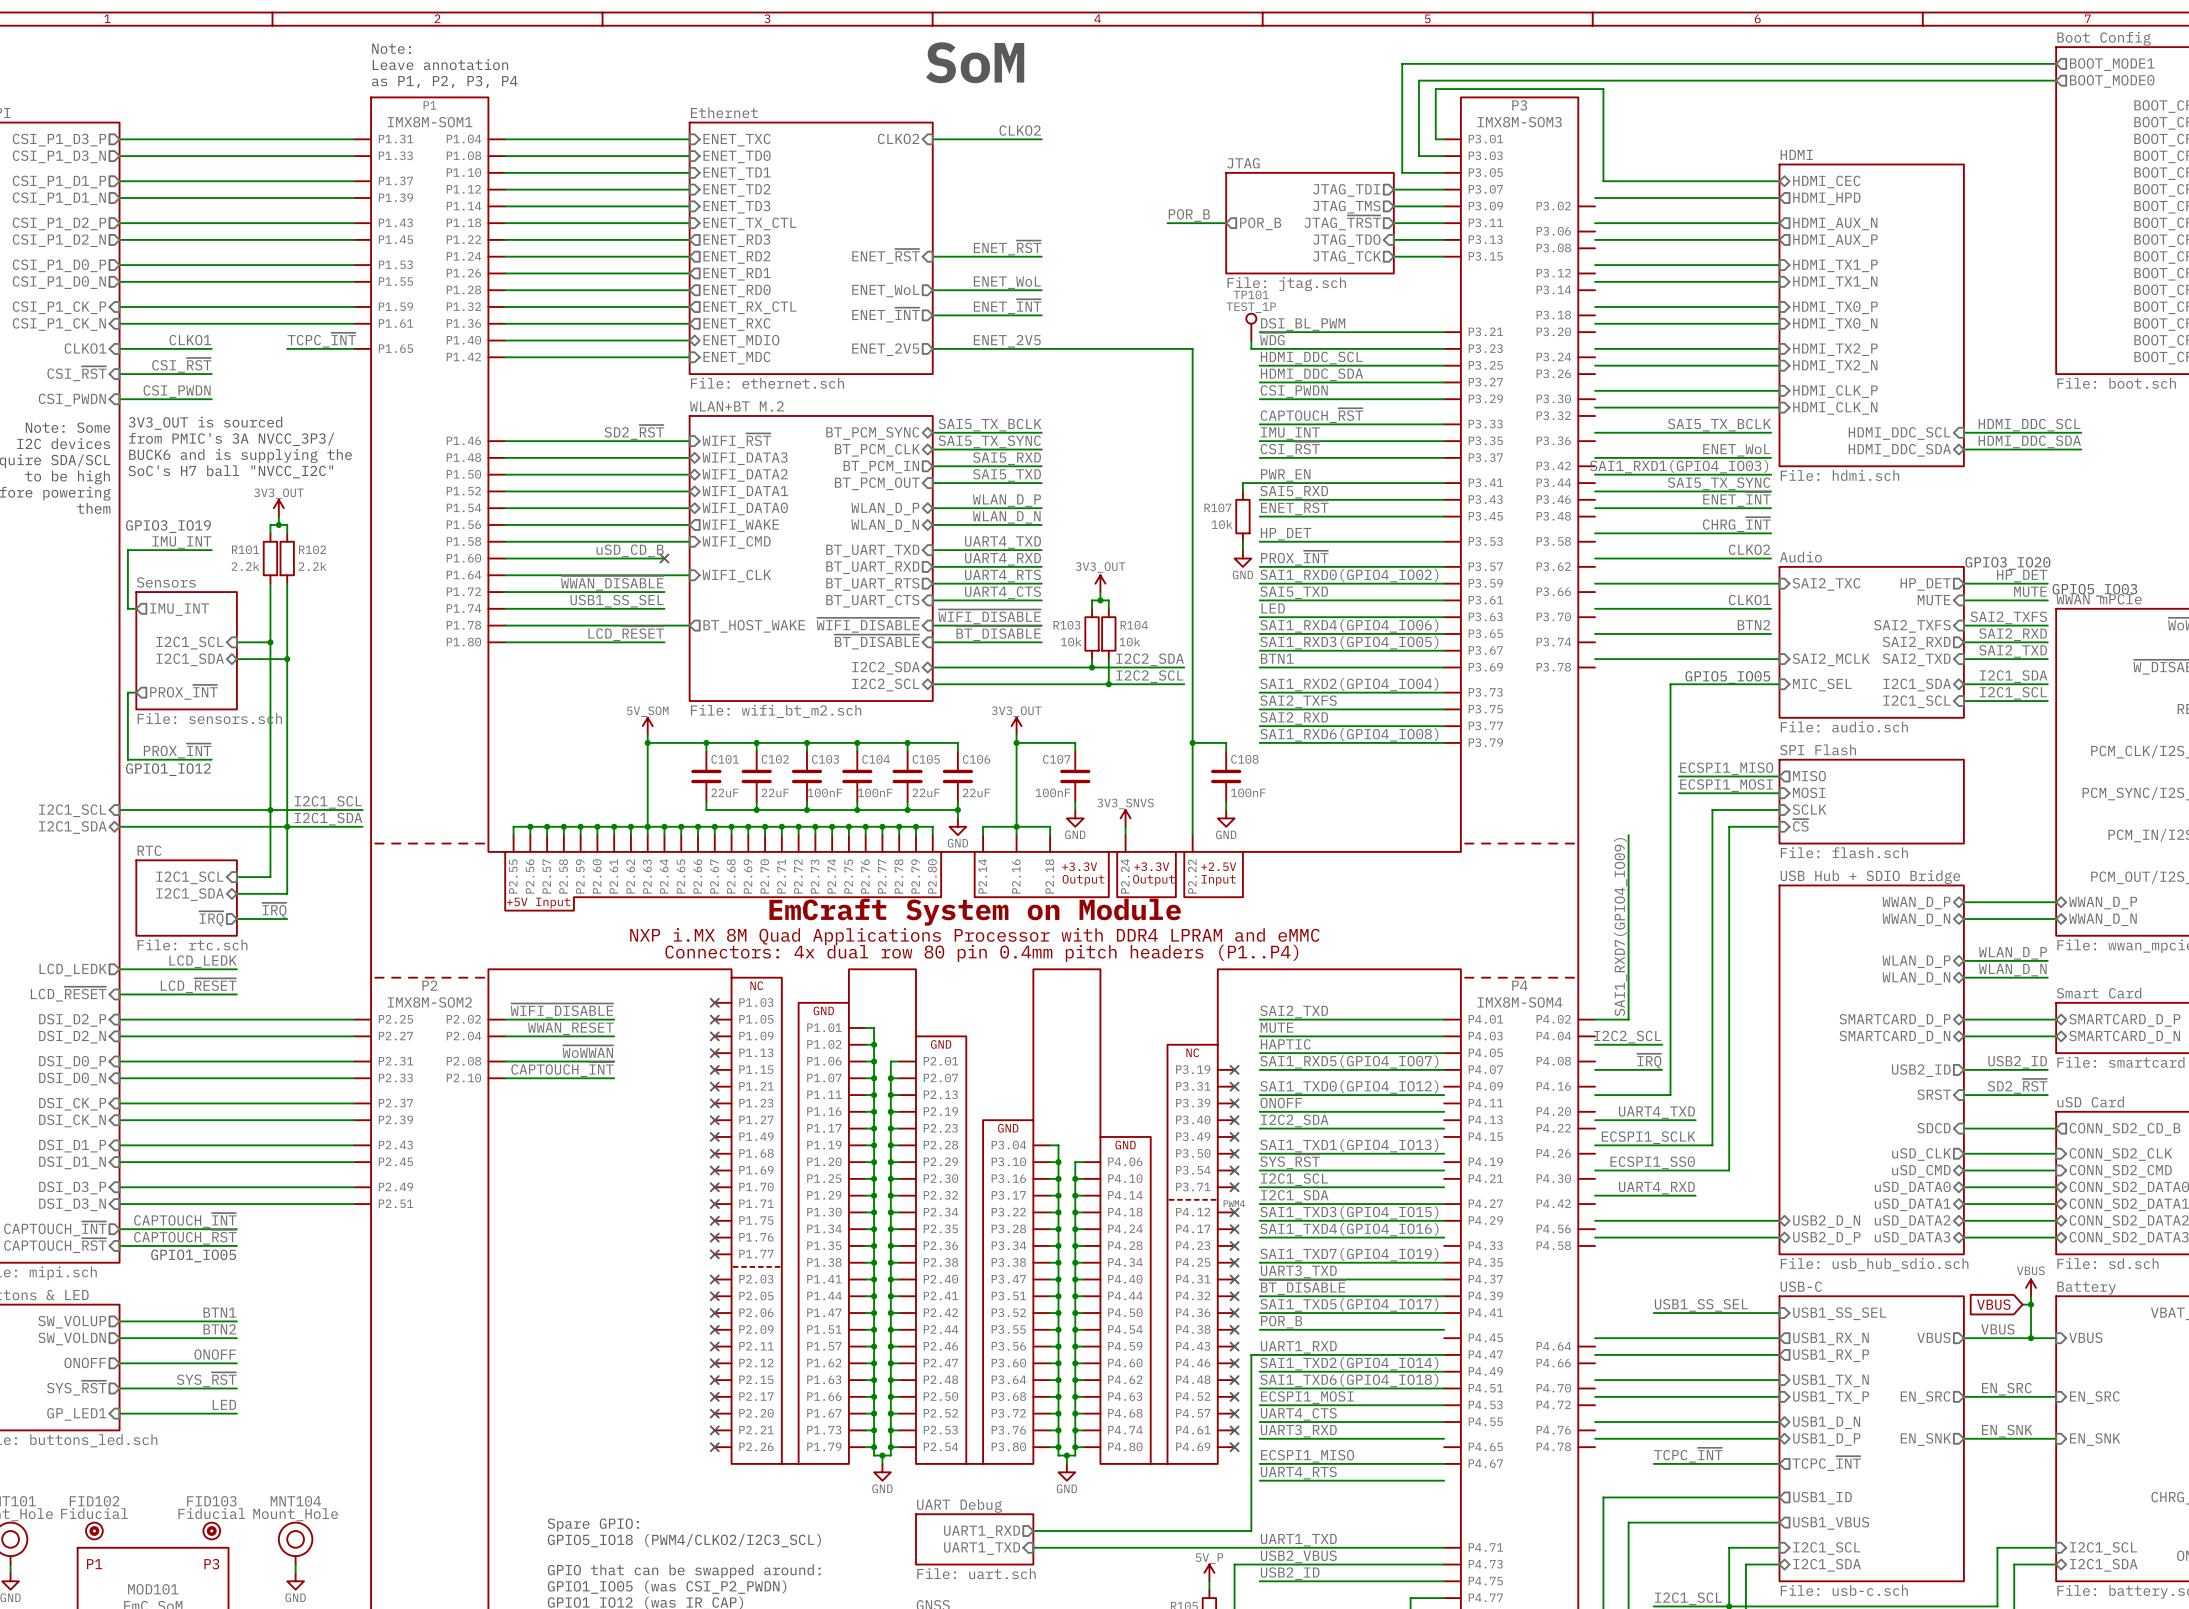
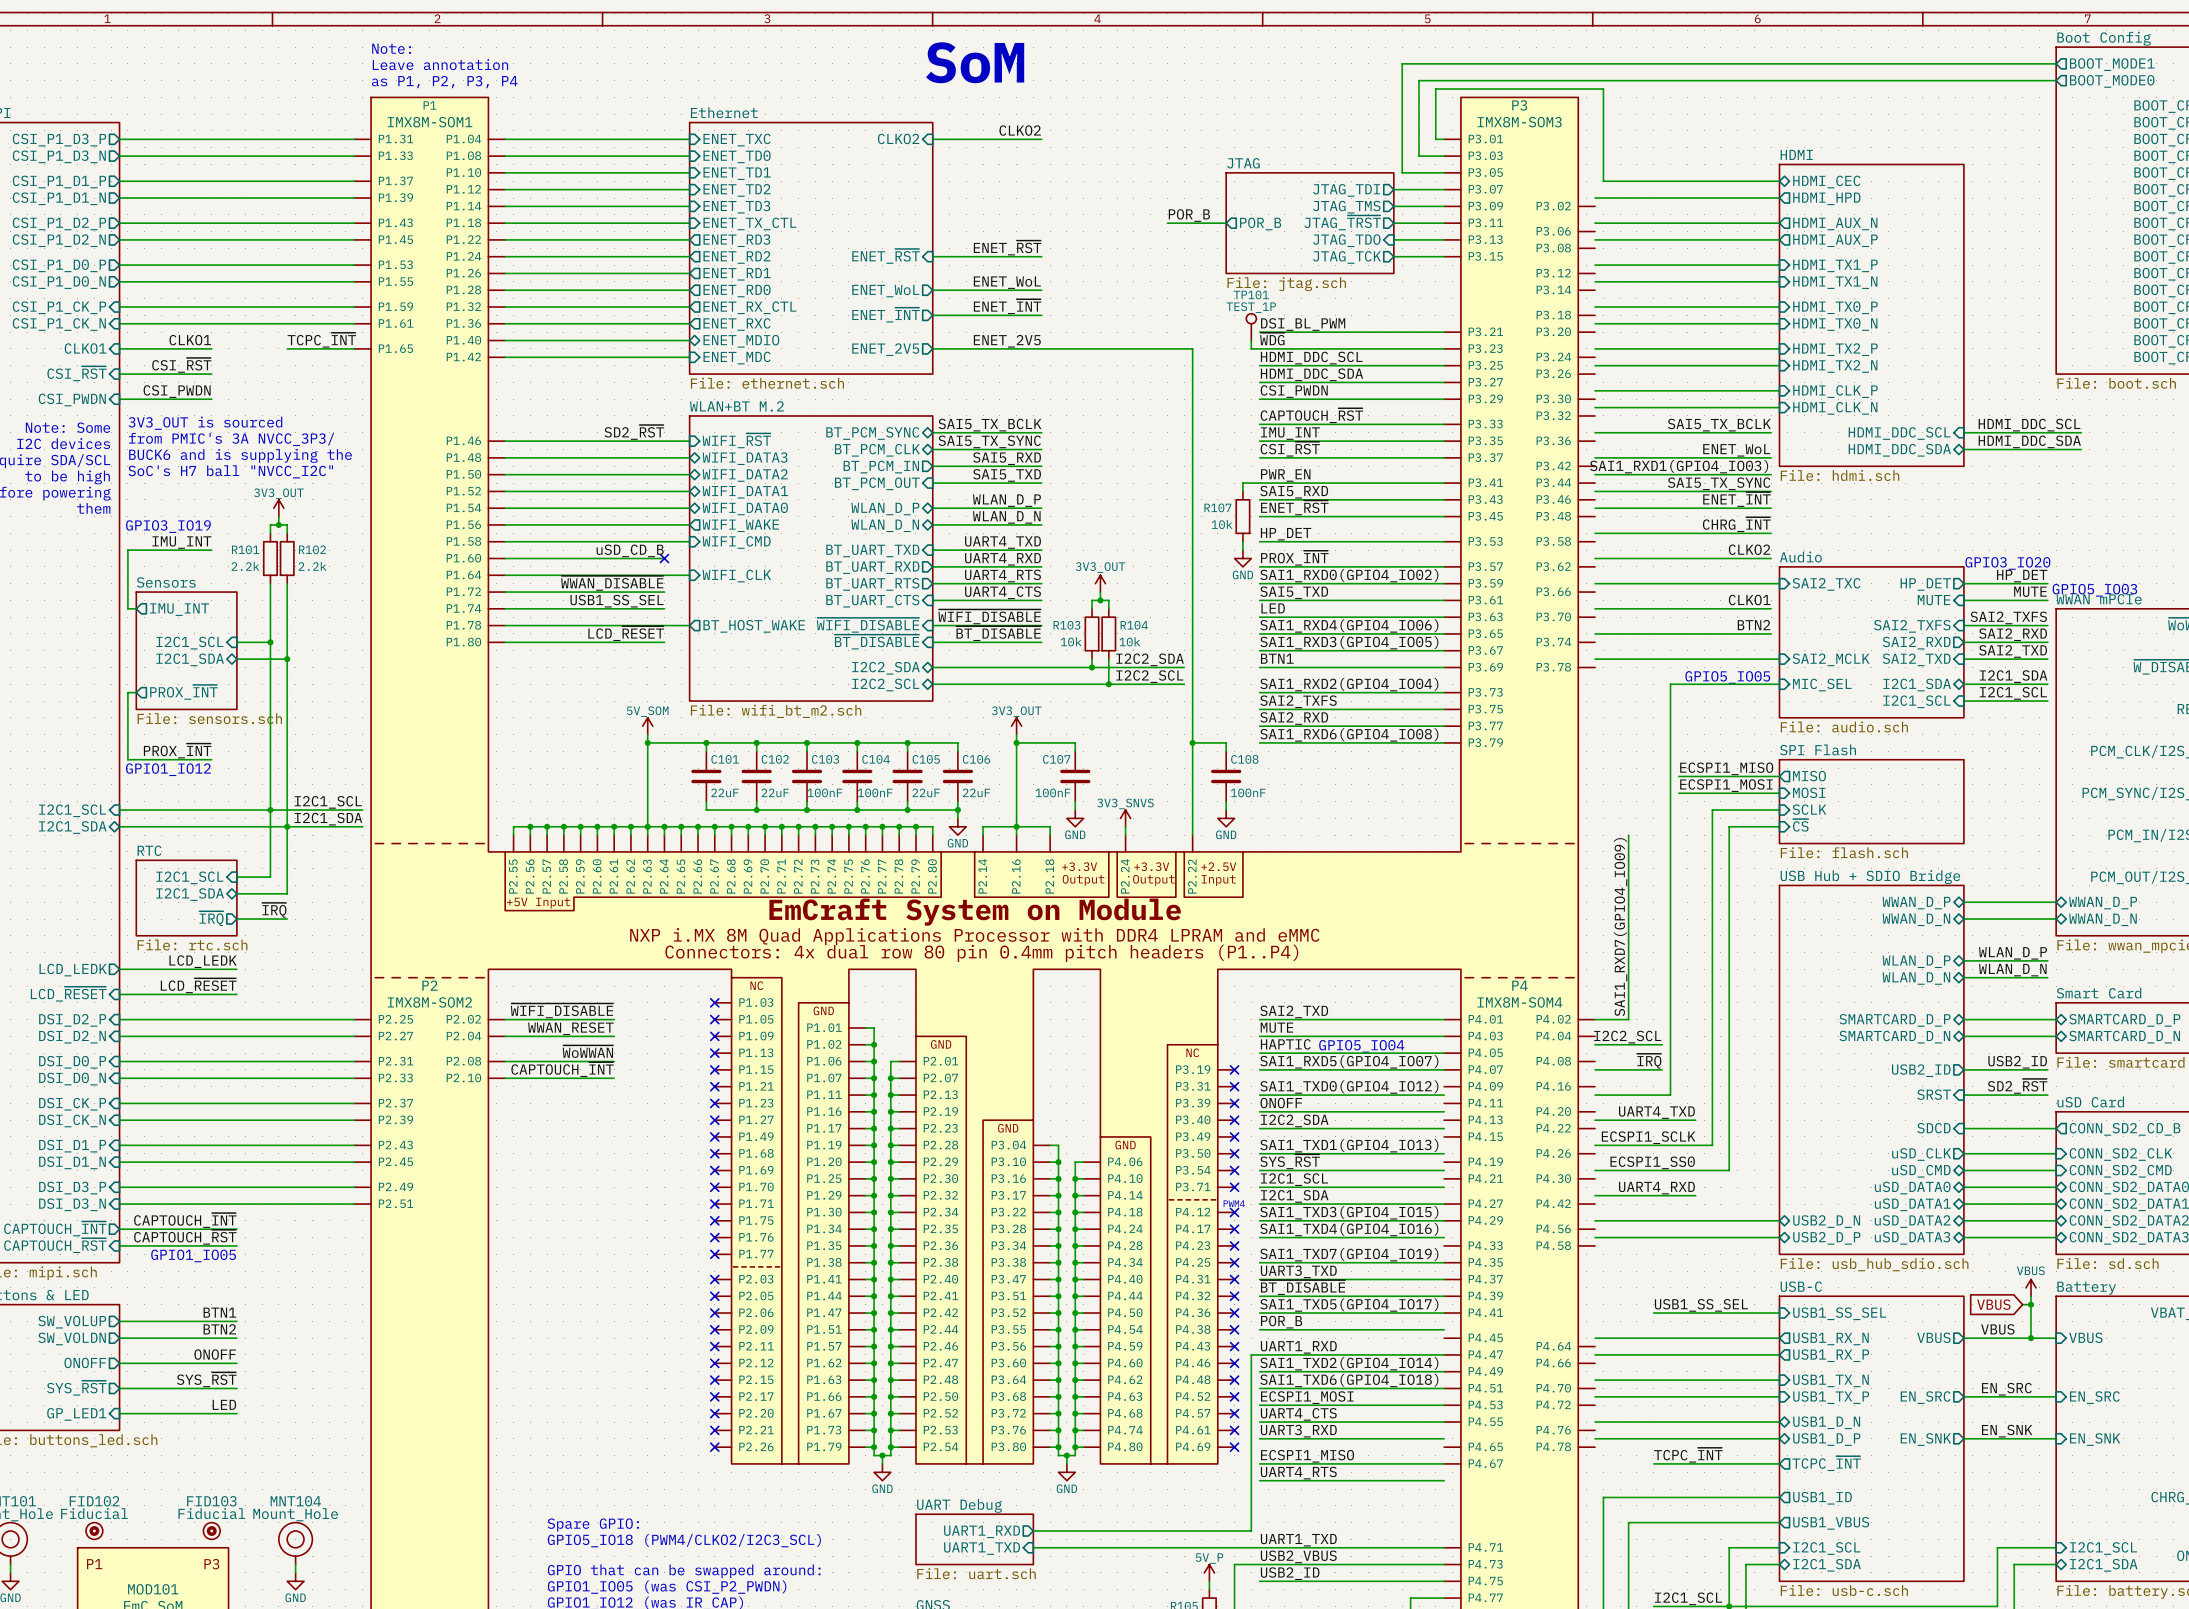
text: none -> GPIO5_IO04 (1361, 1046)

